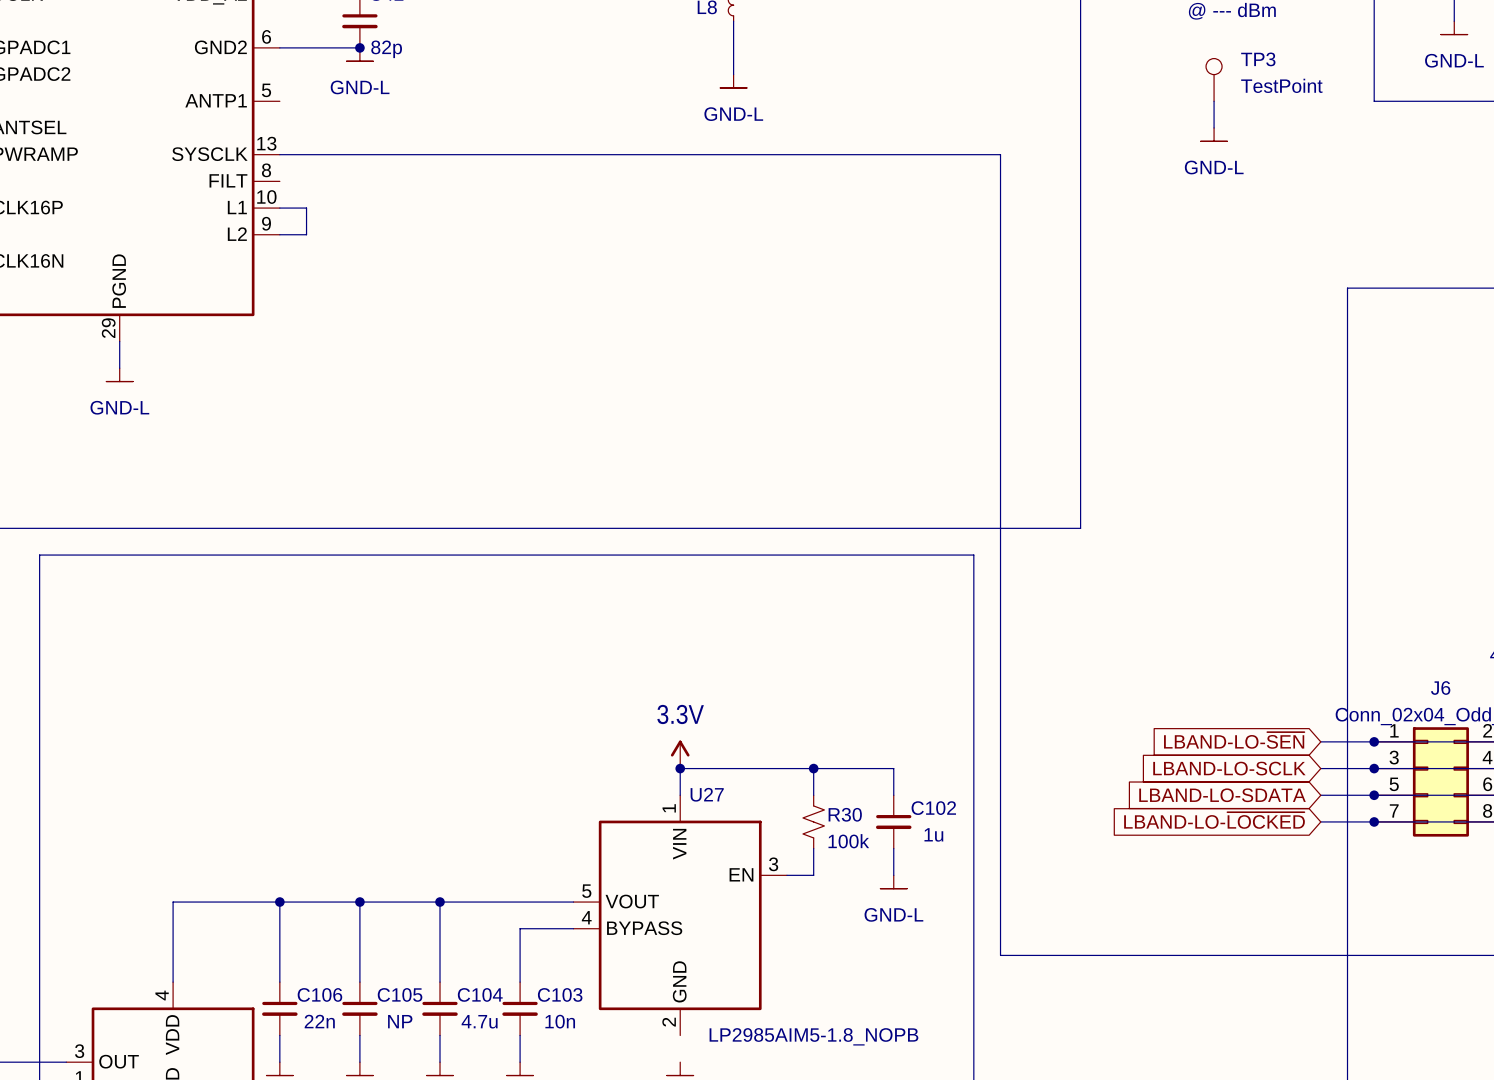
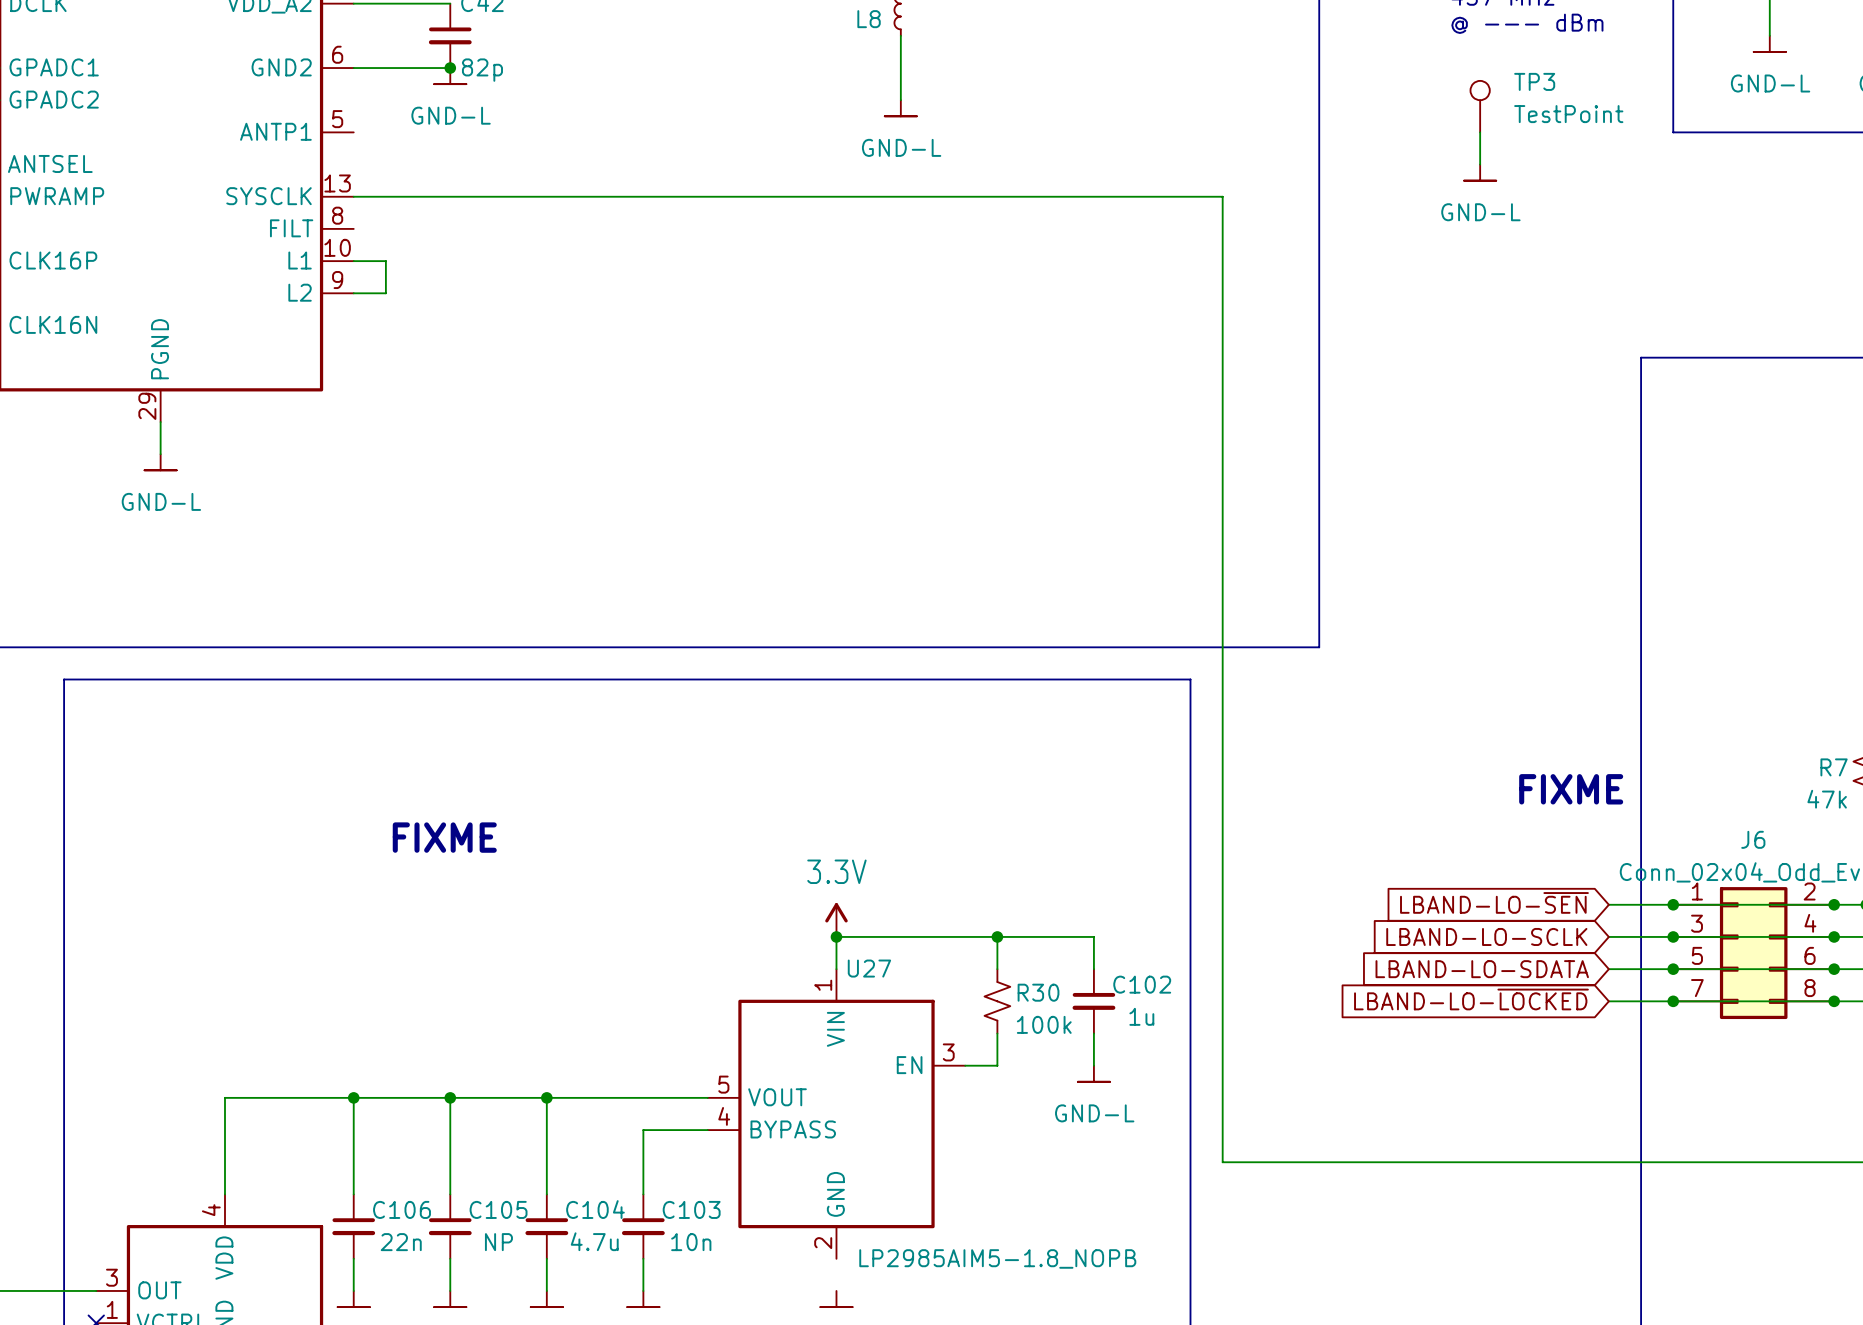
text: none -> FIXME (1571, 789)
text: none -> FIXME (444, 837)

